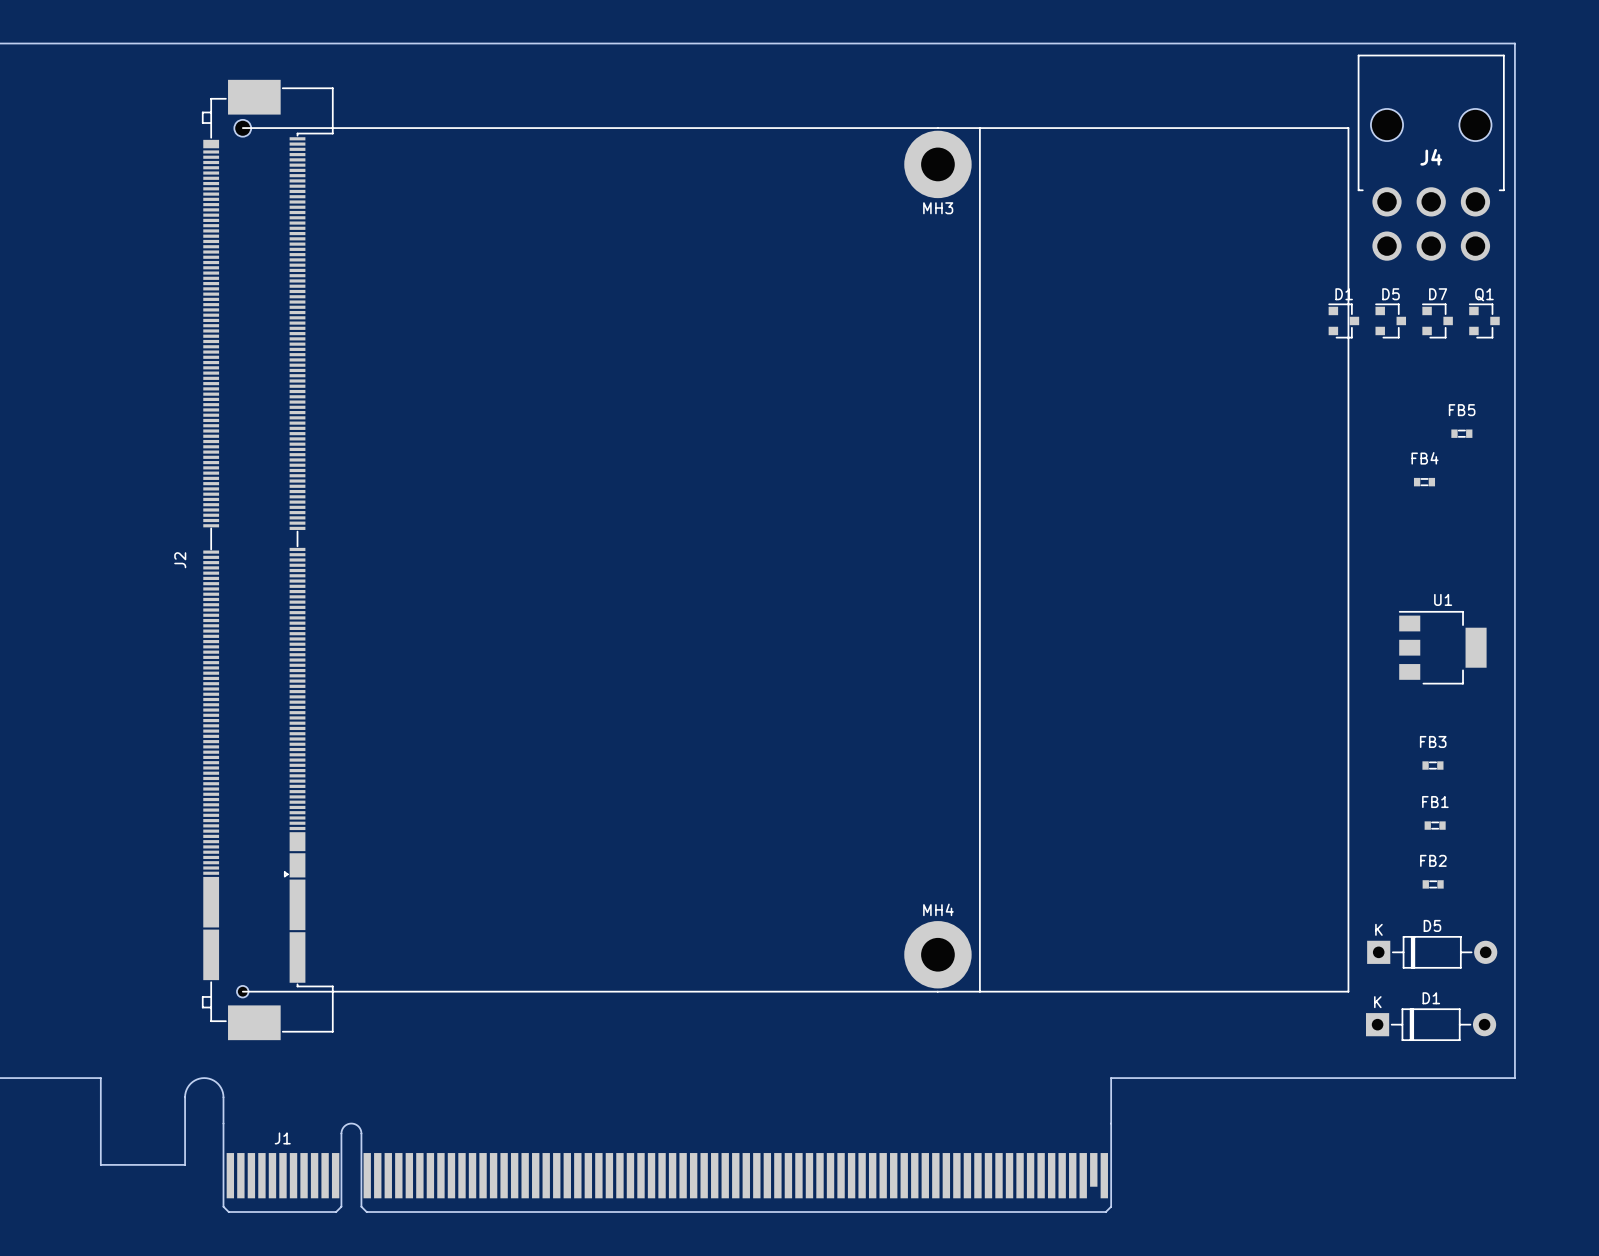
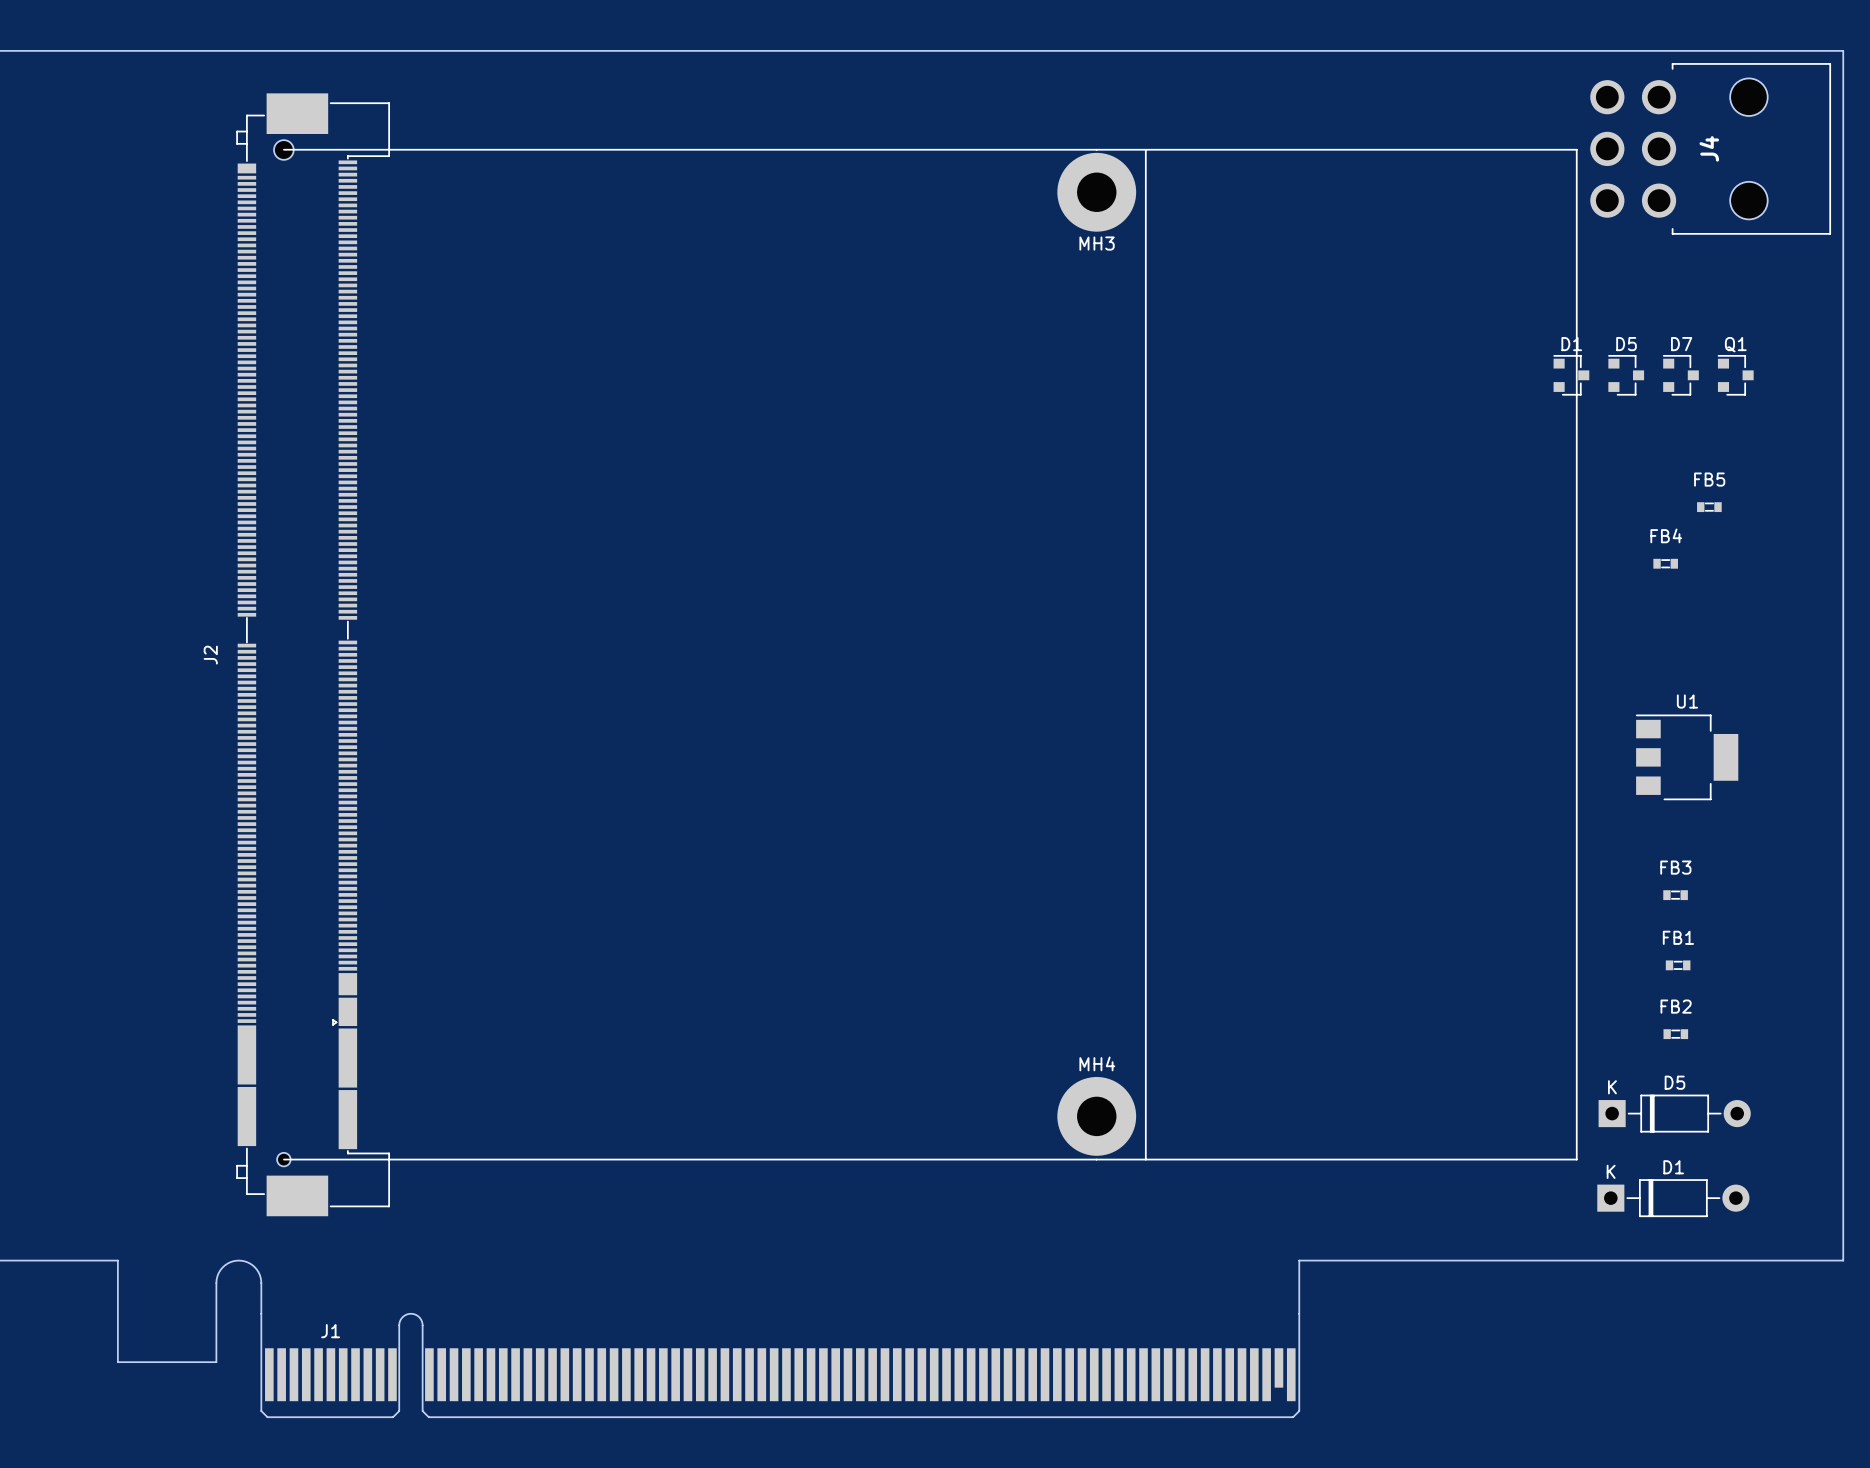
board edge: (1514, 43) (1514, 1078) -> (1771, 50) (1843, 50) (1843, 1260) (1771, 1260)
J4 rotation: 0° (1431, 157) -> 90° clockwise (1710, 148)

